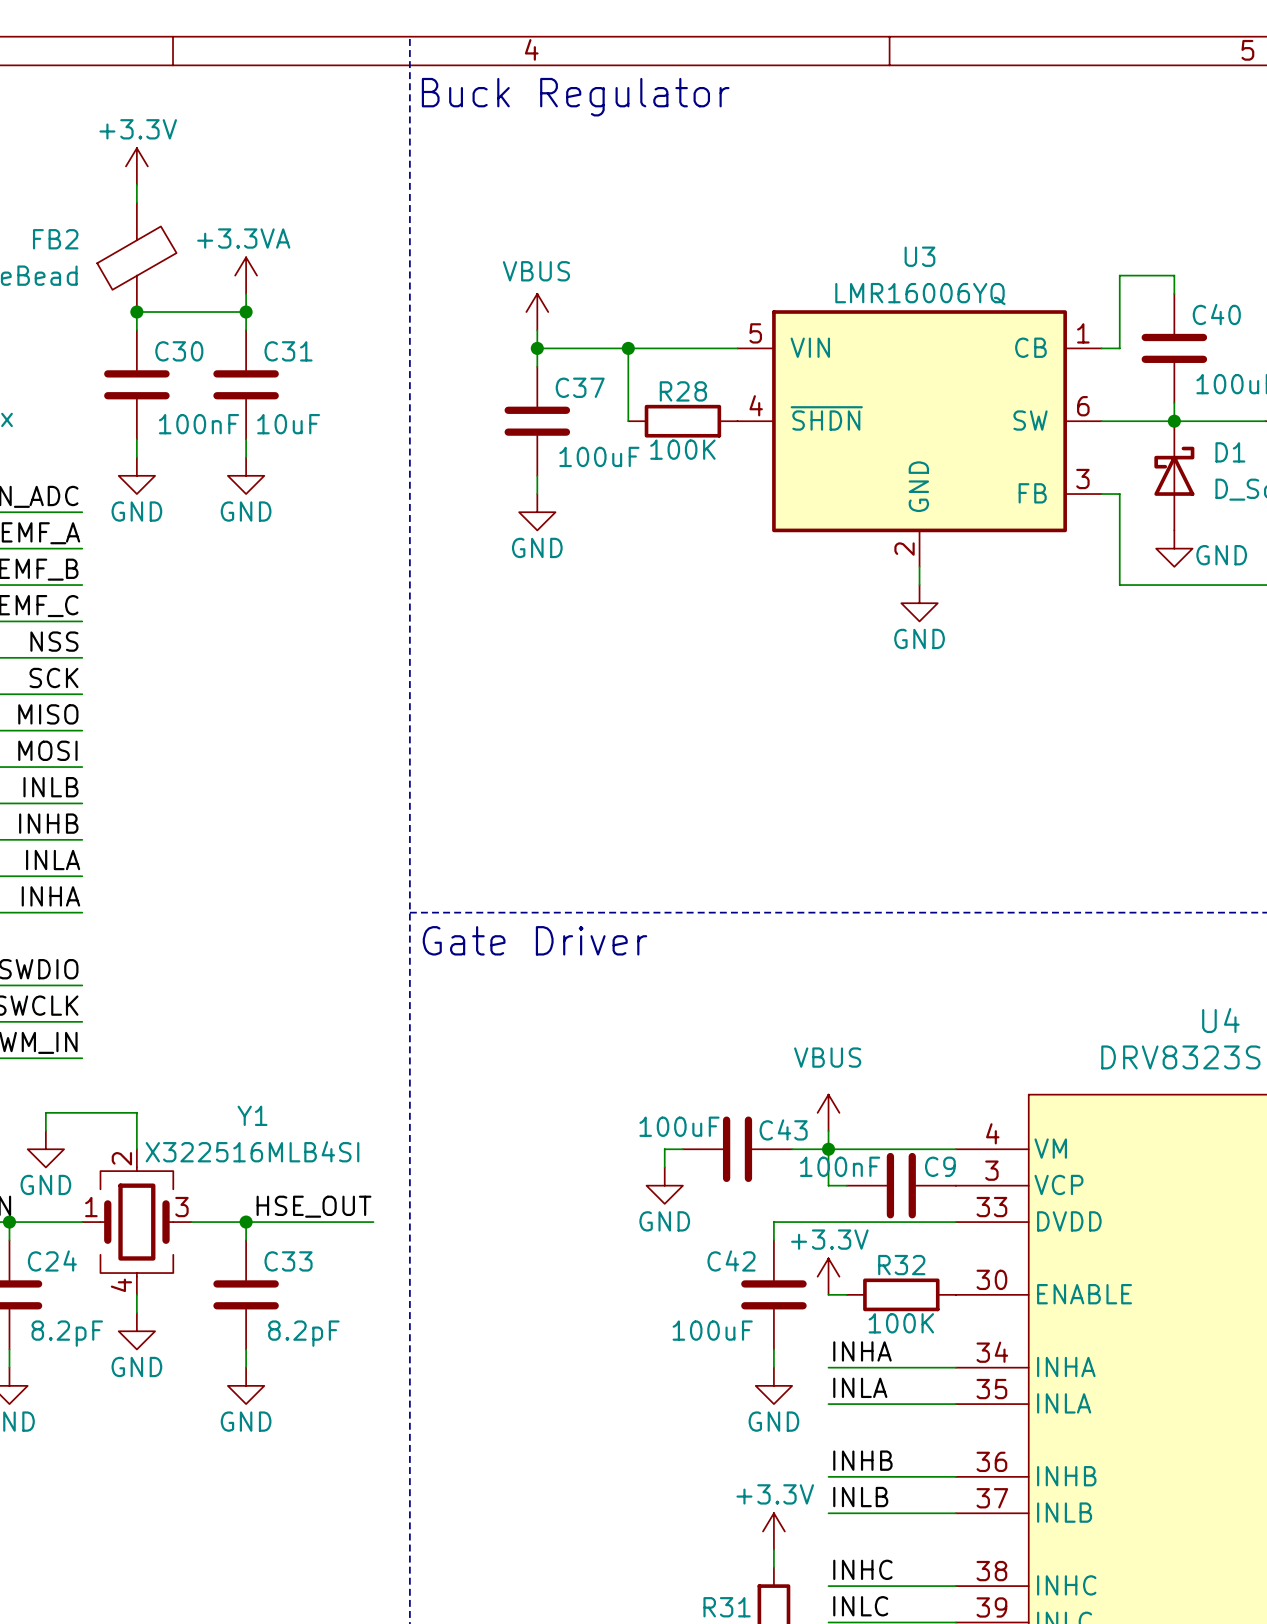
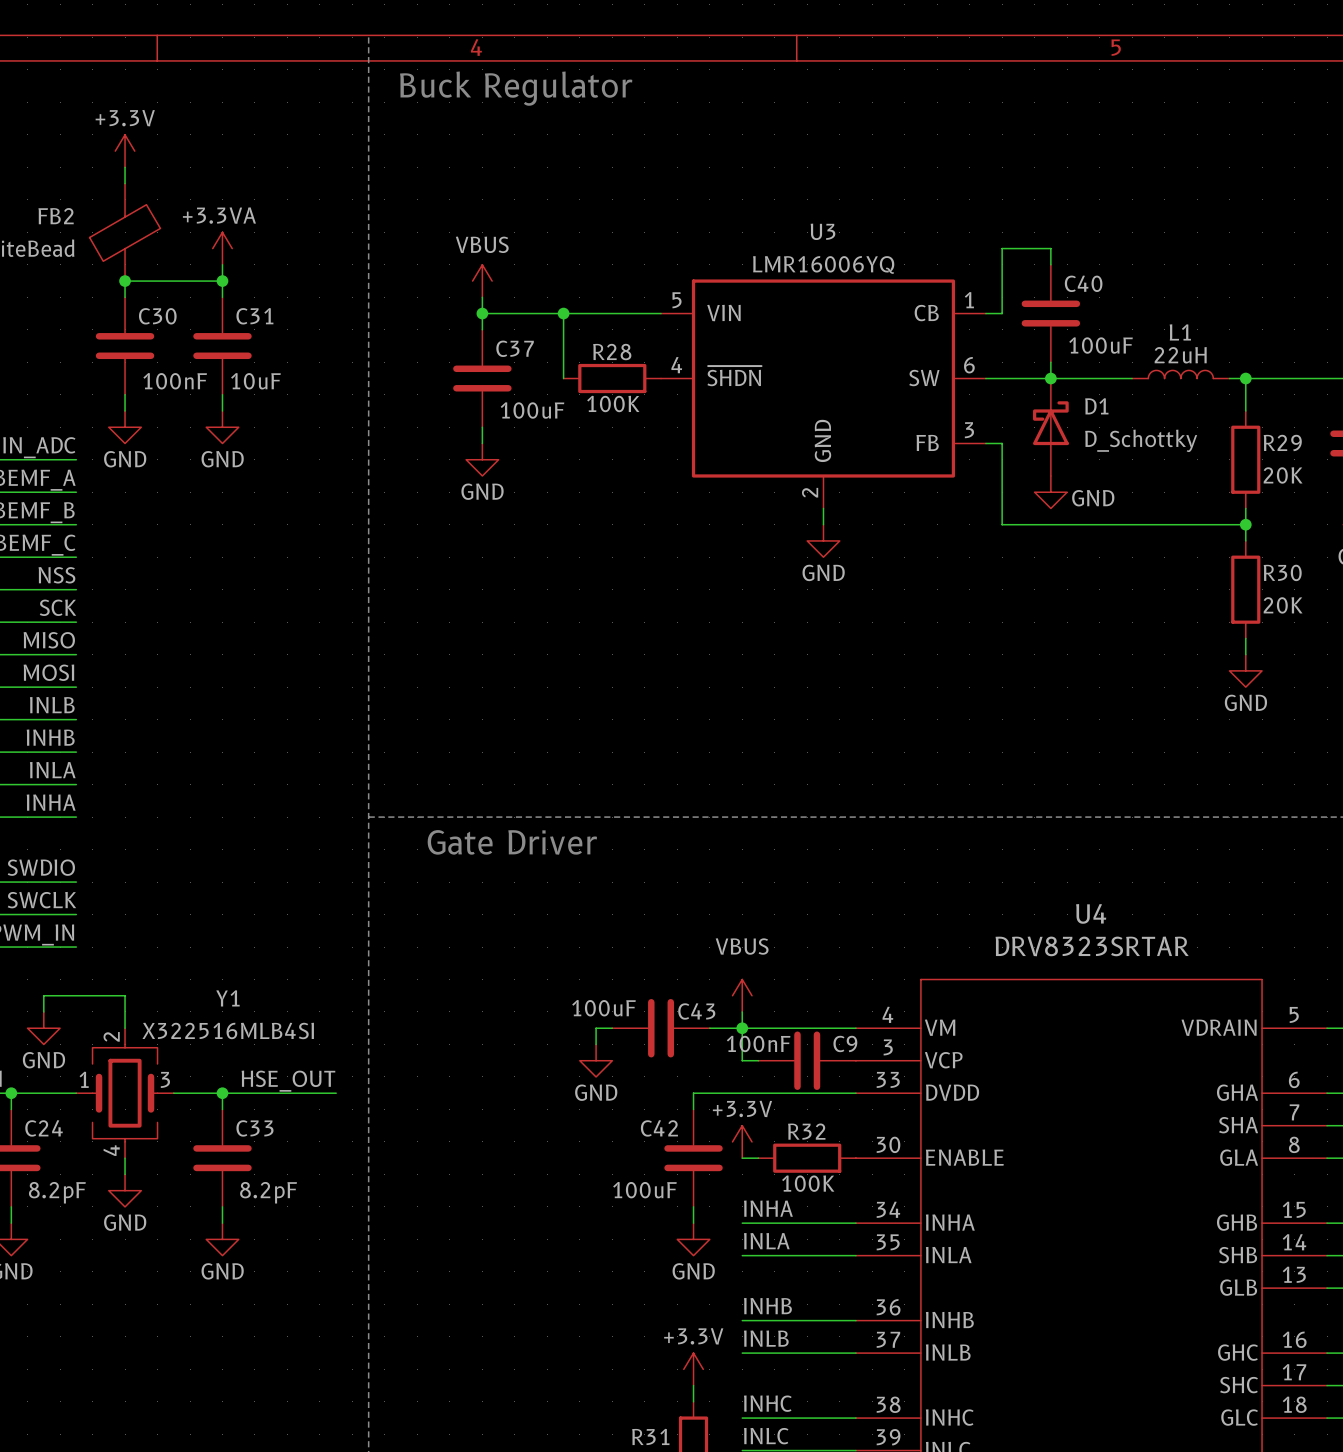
text position: Gate Driver (534, 940) -> Gate Driver (512, 842)

